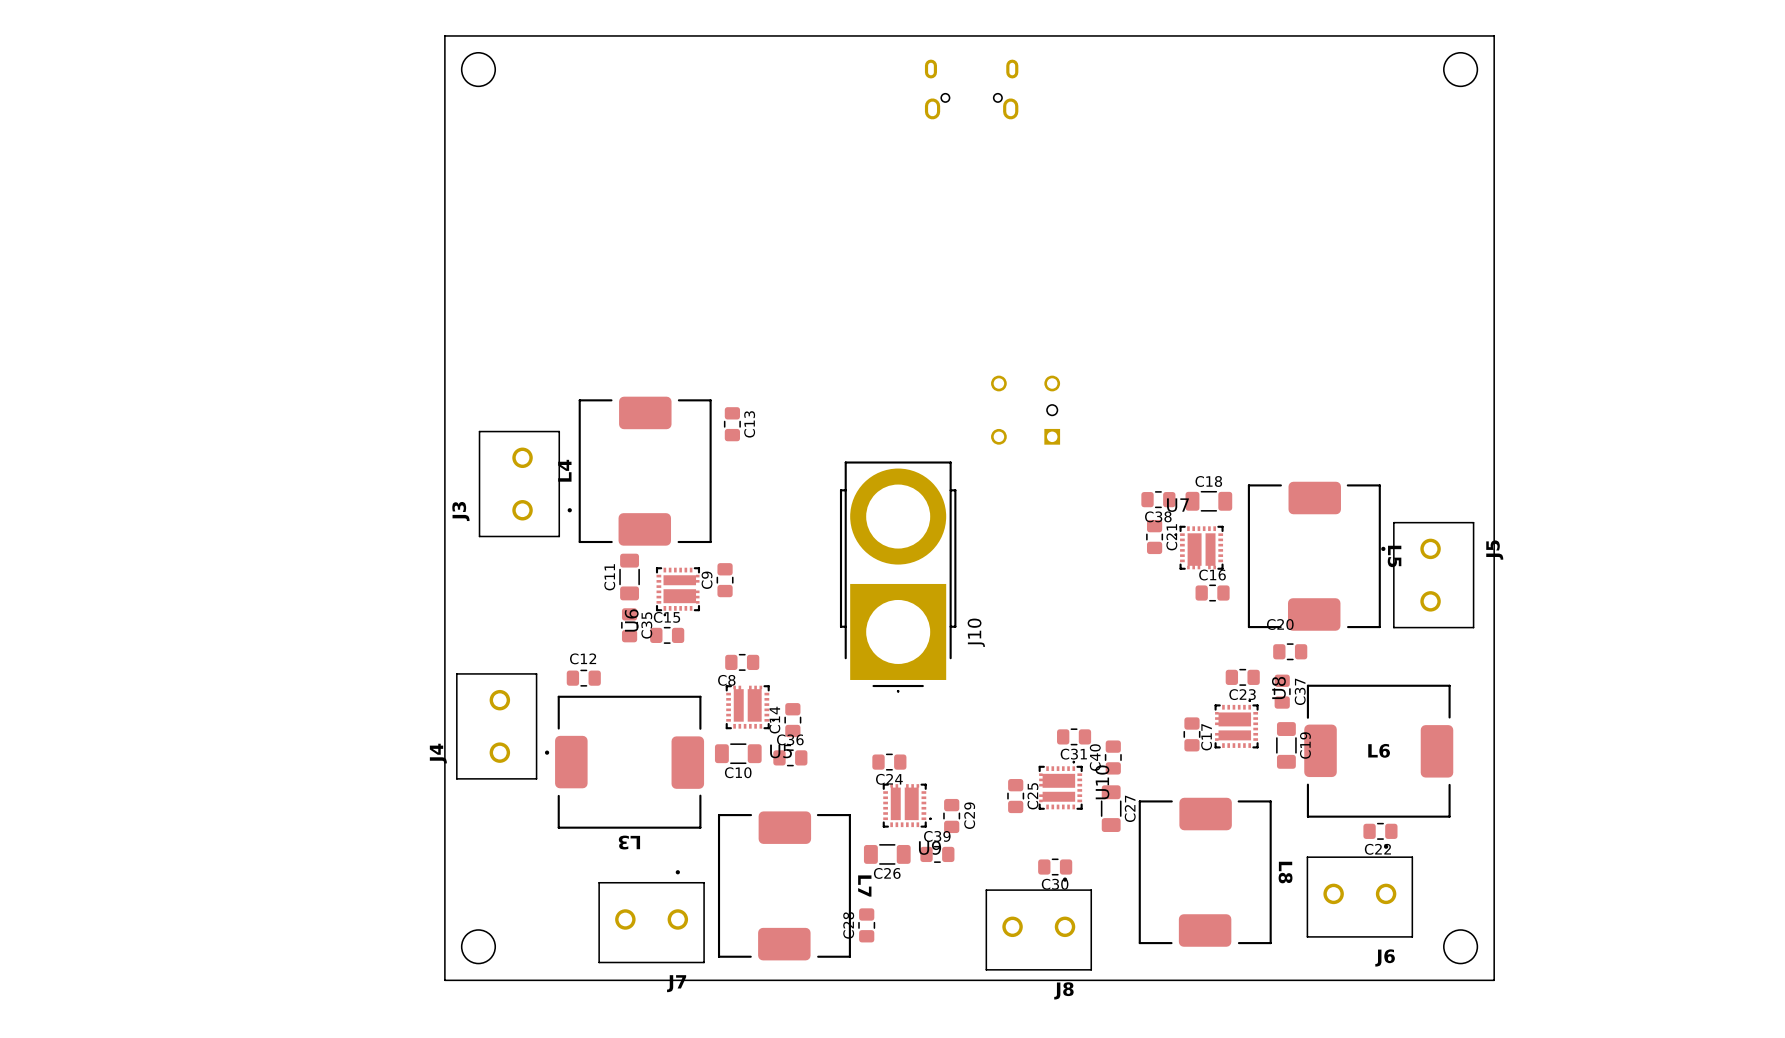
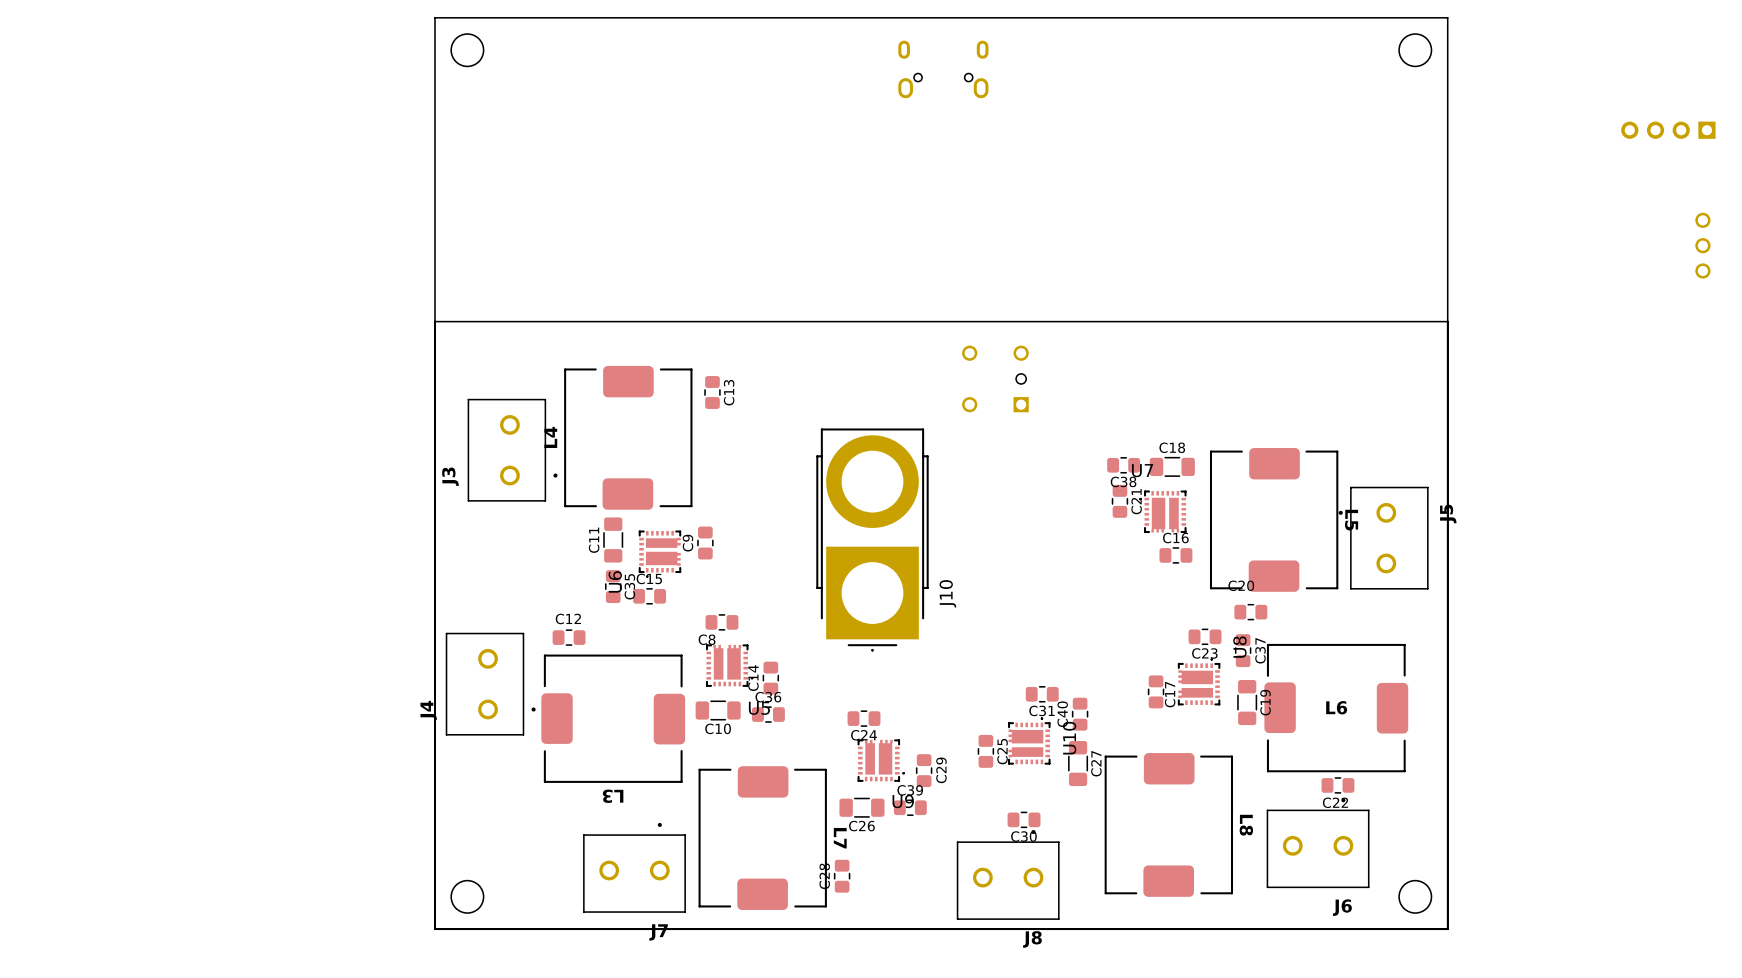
part: none -> (1668, 130)
part: none -> (1702, 245)
board edge: none -> (434, 321) (1447, 321) (1447, 929) (434, 929) (434, 321)

